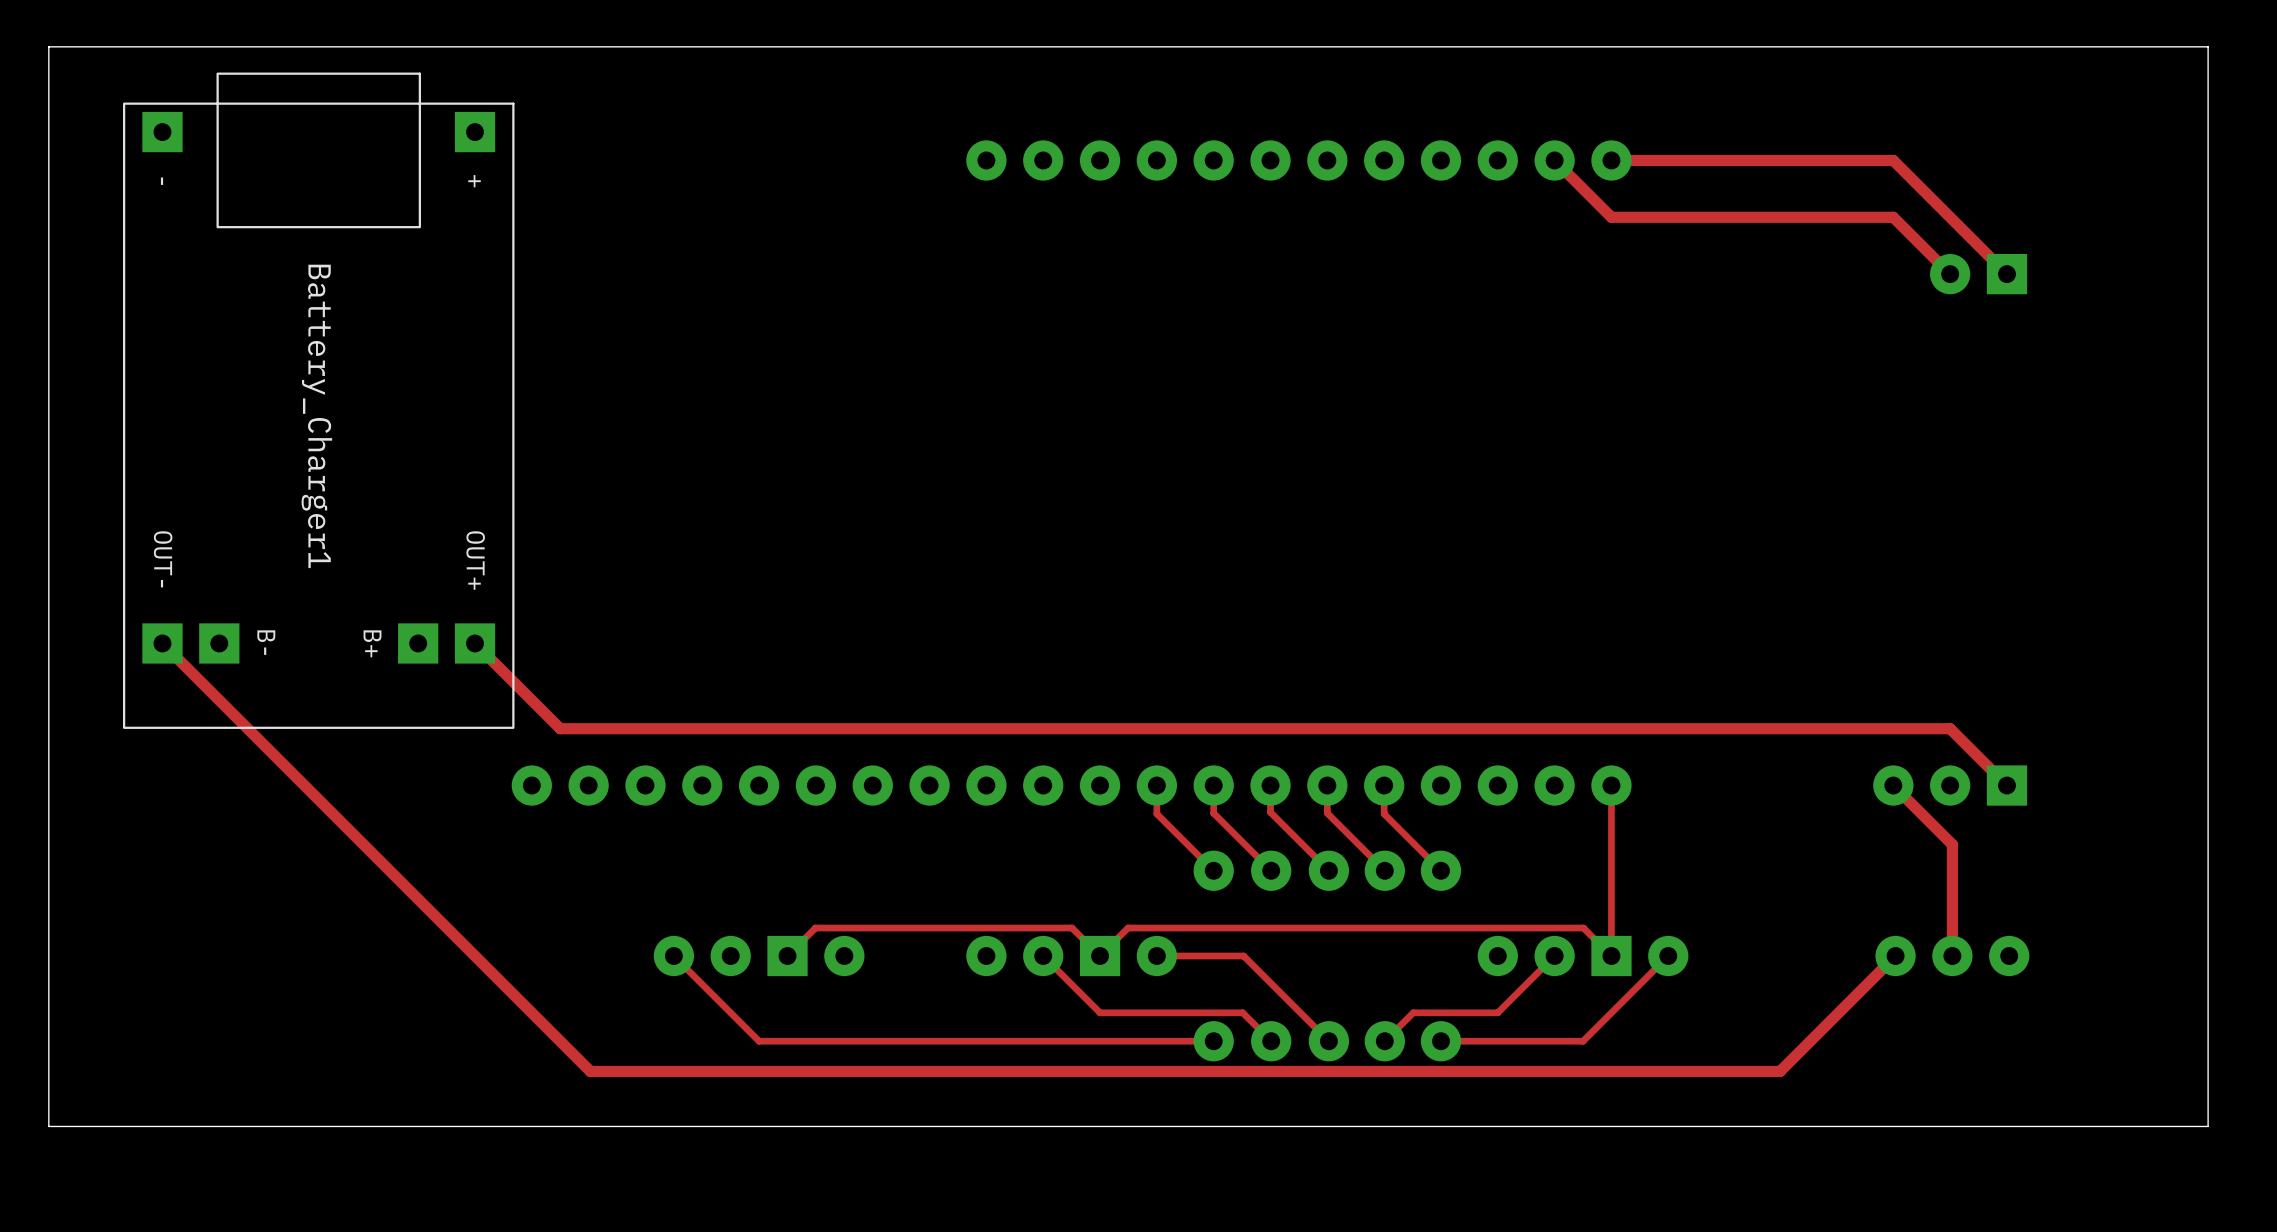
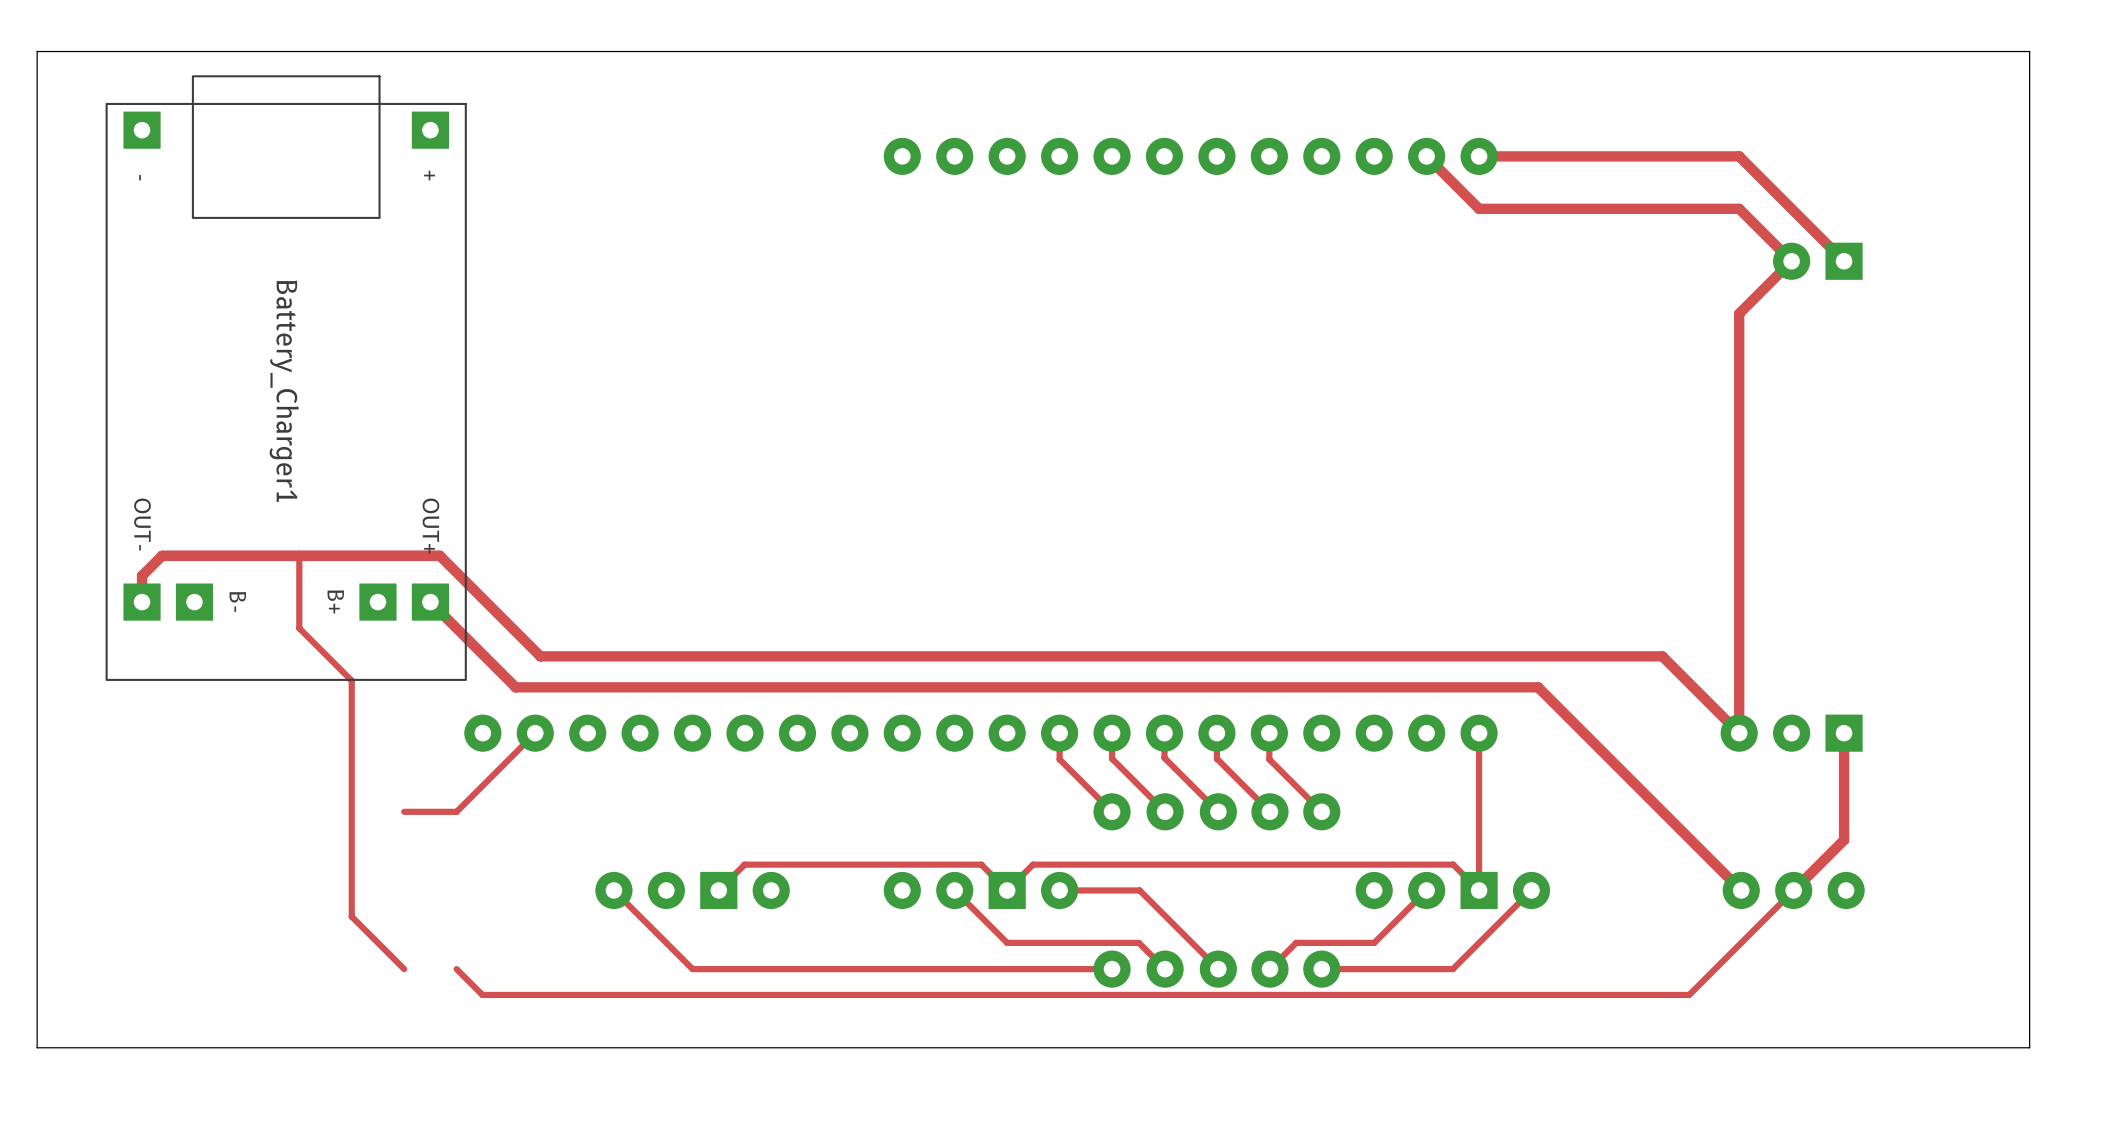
top track: none -> (299, 555) (299, 628) (351, 680) (351, 916) (404, 969)
top track: (162, 643) (590, 1071) (1780, 1071) (1895, 956) -> (142, 602) (142, 575) (161, 555) (439, 555) (540, 656) (1662, 656) (1739, 733) (1739, 313) (1791, 261)
top track: (560, 728) (1950, 728) (2006, 785) -> (509, 680) (515, 687) (1538, 687) (1741, 890)
top track: none -> (535, 733) (456, 811) (404, 811)
top track: (1893, 785) (1952, 844) (1952, 956) -> none
top track: none -> (1844, 733) (1844, 840) (1689, 994) (482, 994) (456, 969)

